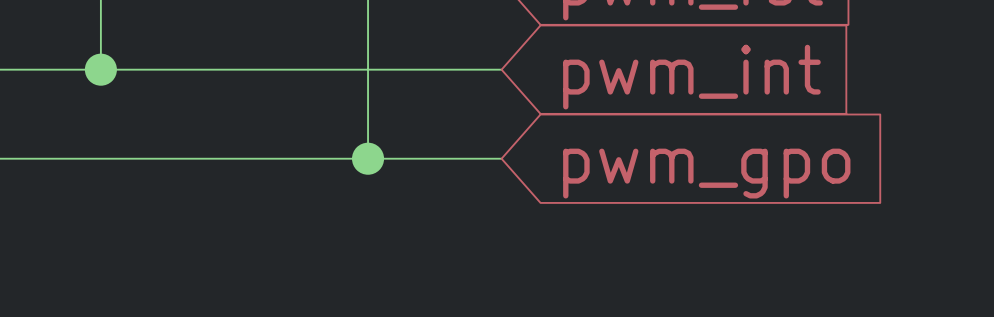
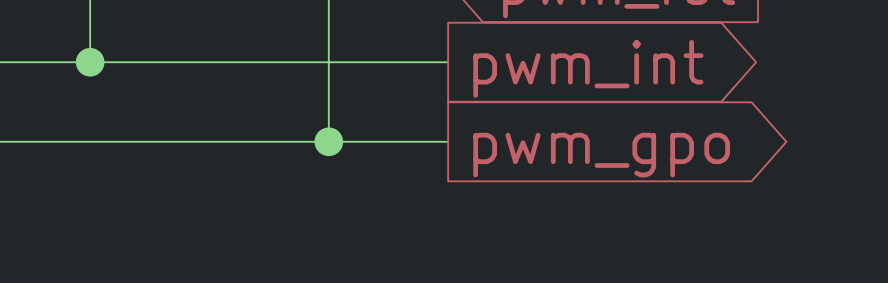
global label shape: input (691, 77) -> output (588, 68)
global label shape: input (706, 173) -> output (601, 155)

